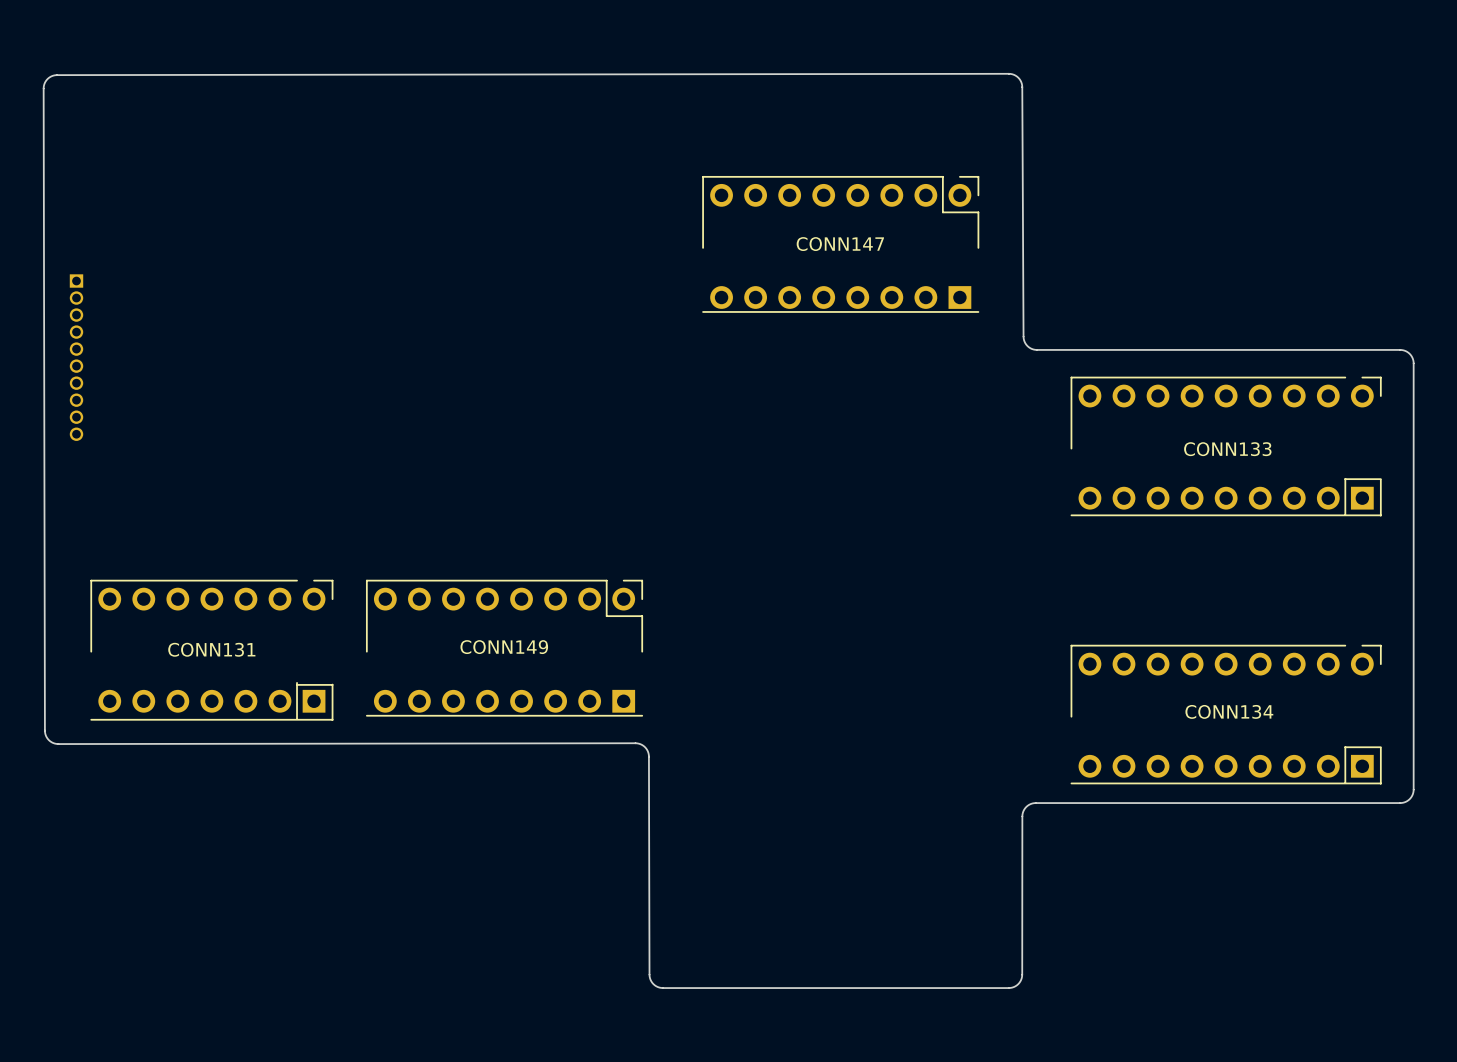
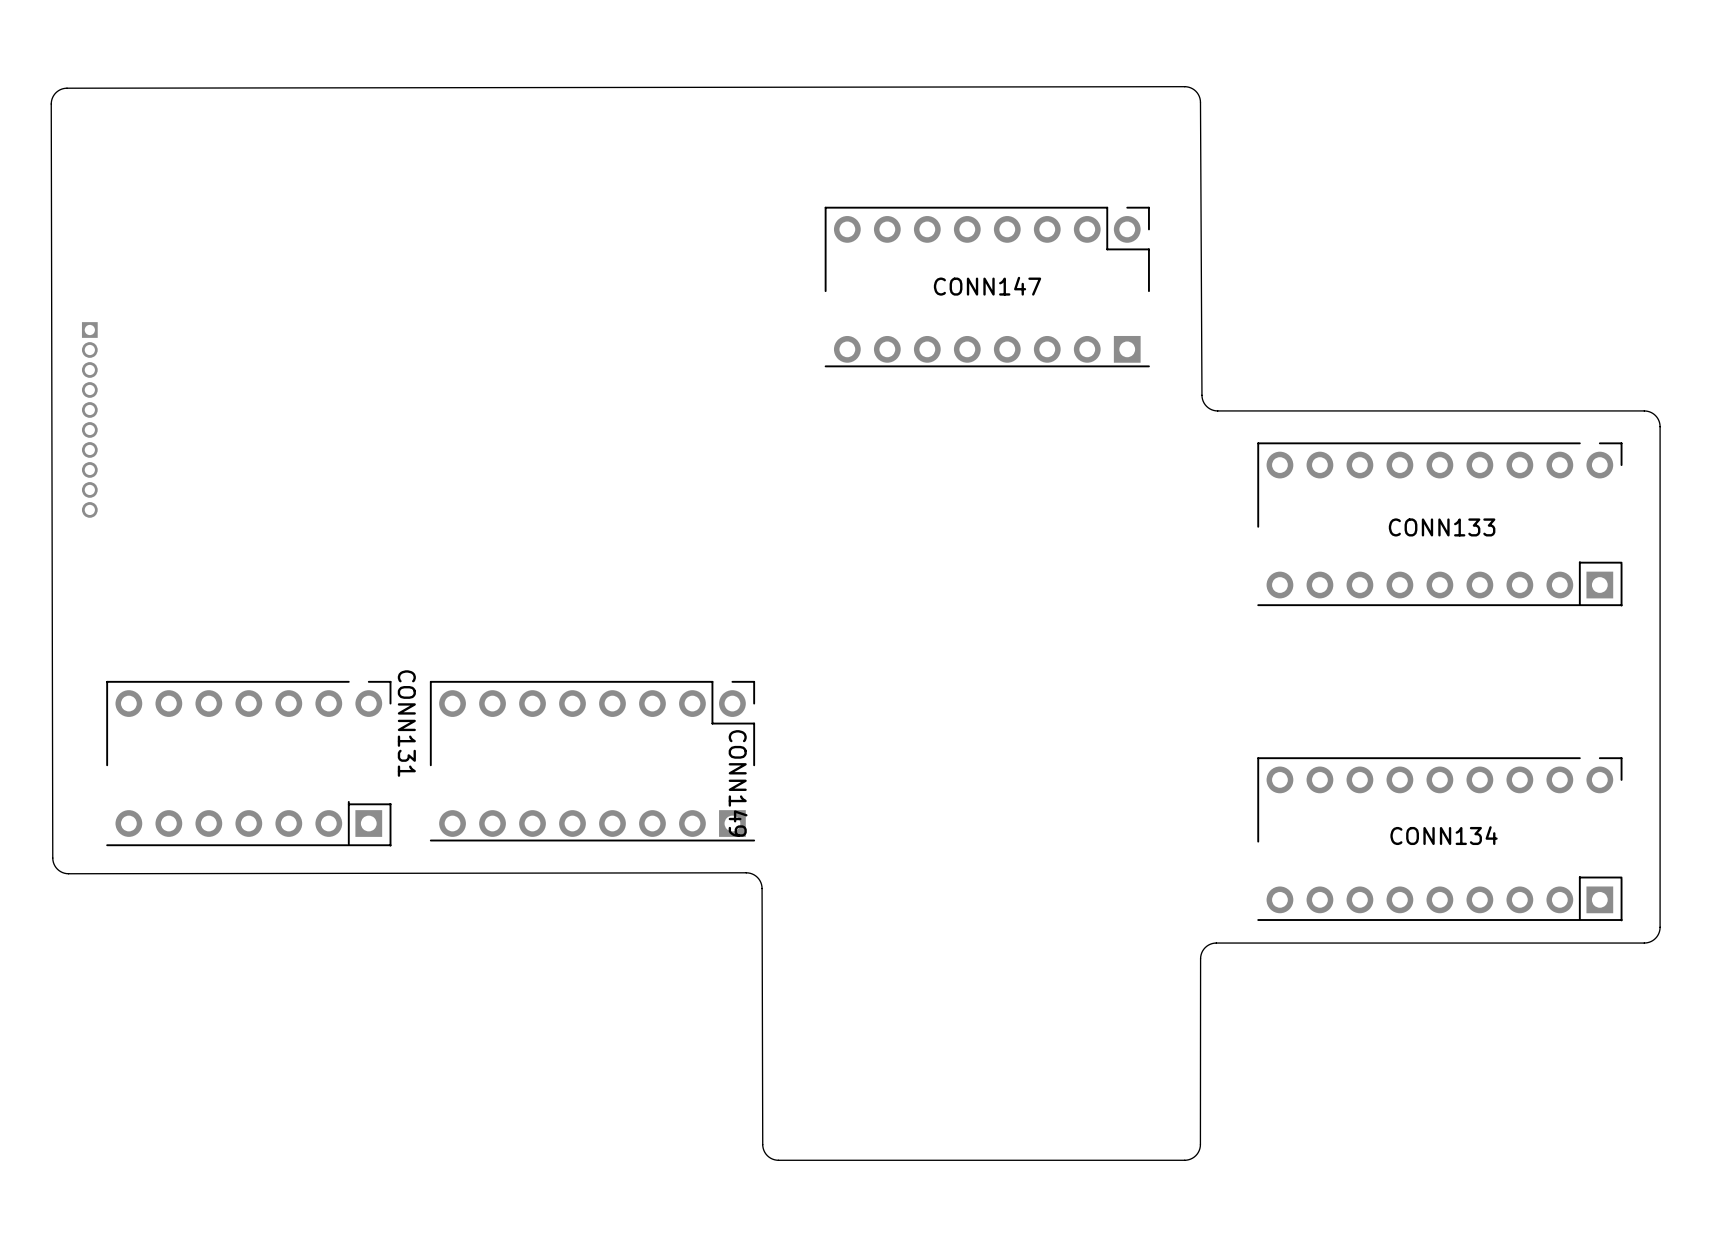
CONN149 name rotation: 0° (504, 647) -> 90° clockwise (738, 783)
CONN149 name position: CONN149 (504, 647) -> CONN149 (738, 783)
CONN131 name rotation: 0° (211, 649) -> 90° clockwise (406, 723)
CONN131 name position: CONN131 (211, 649) -> CONN131 (406, 723)

